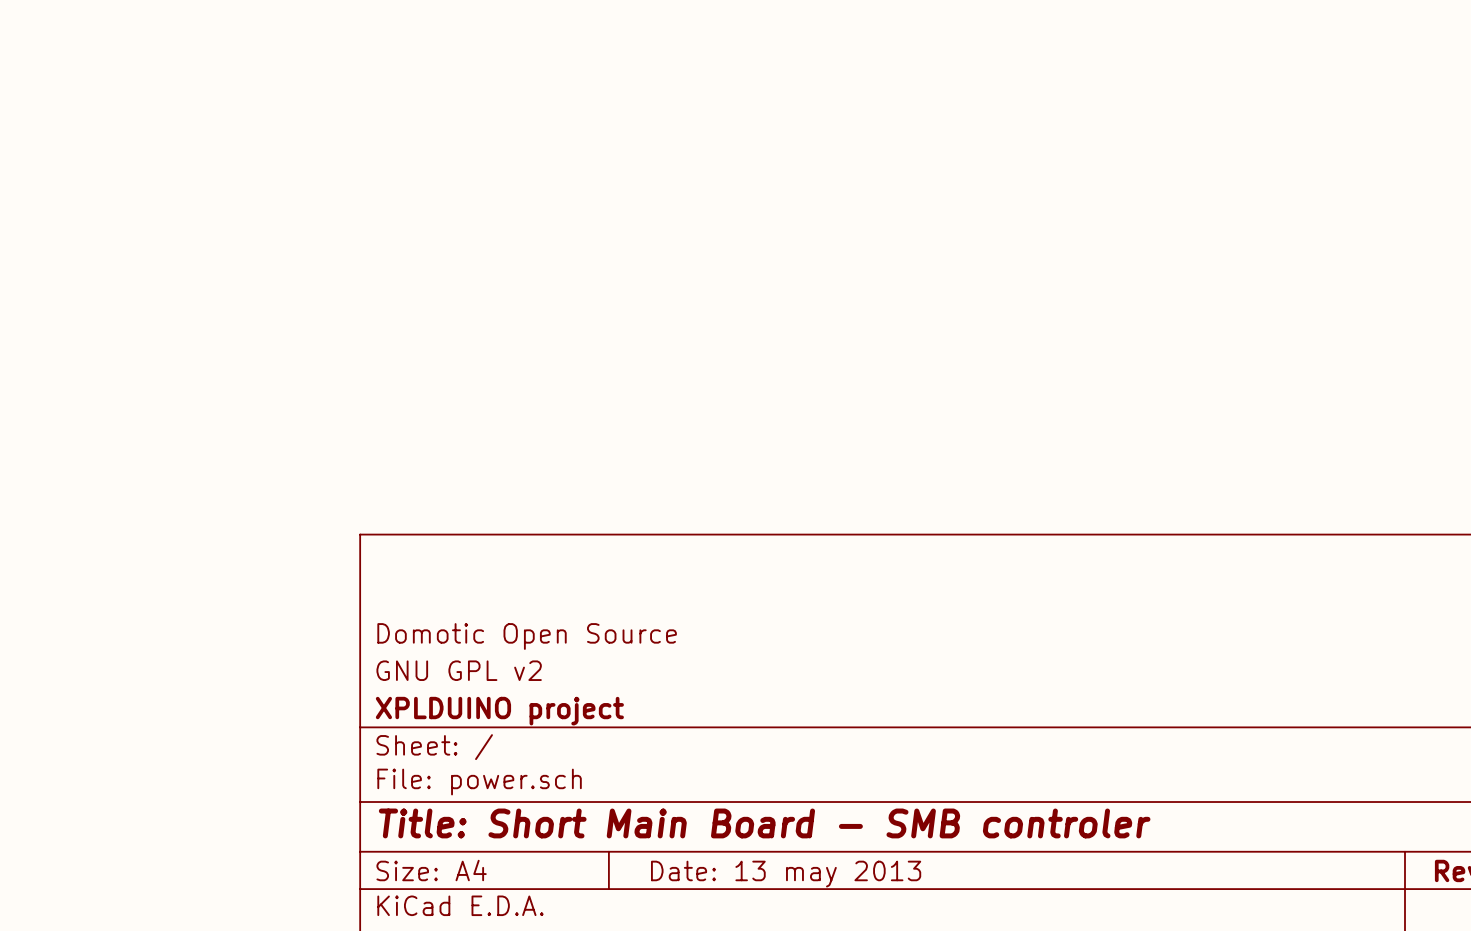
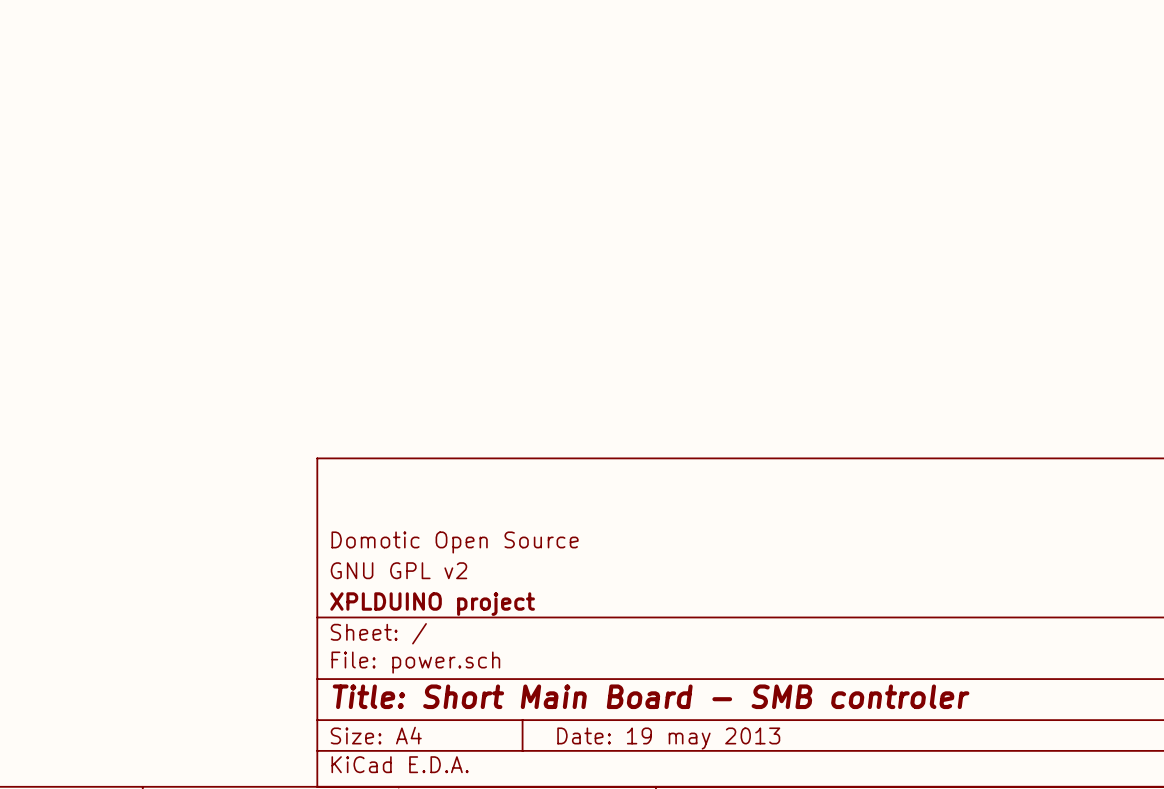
title block: Date: 13 may 2013 (786, 874) -> Date: 19 may 2013 (668, 738)

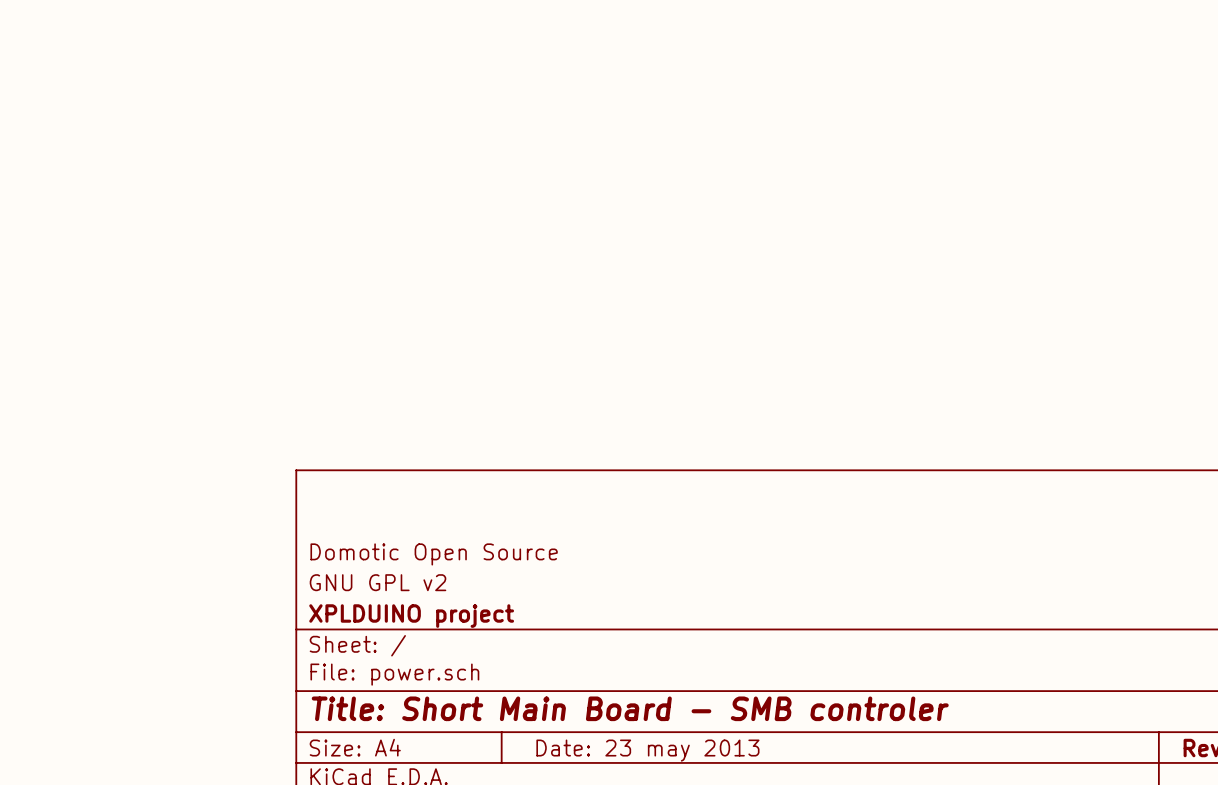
title block: Date: 19 may 2013 (668, 738) -> Date: 23 may 2013 (647, 750)

